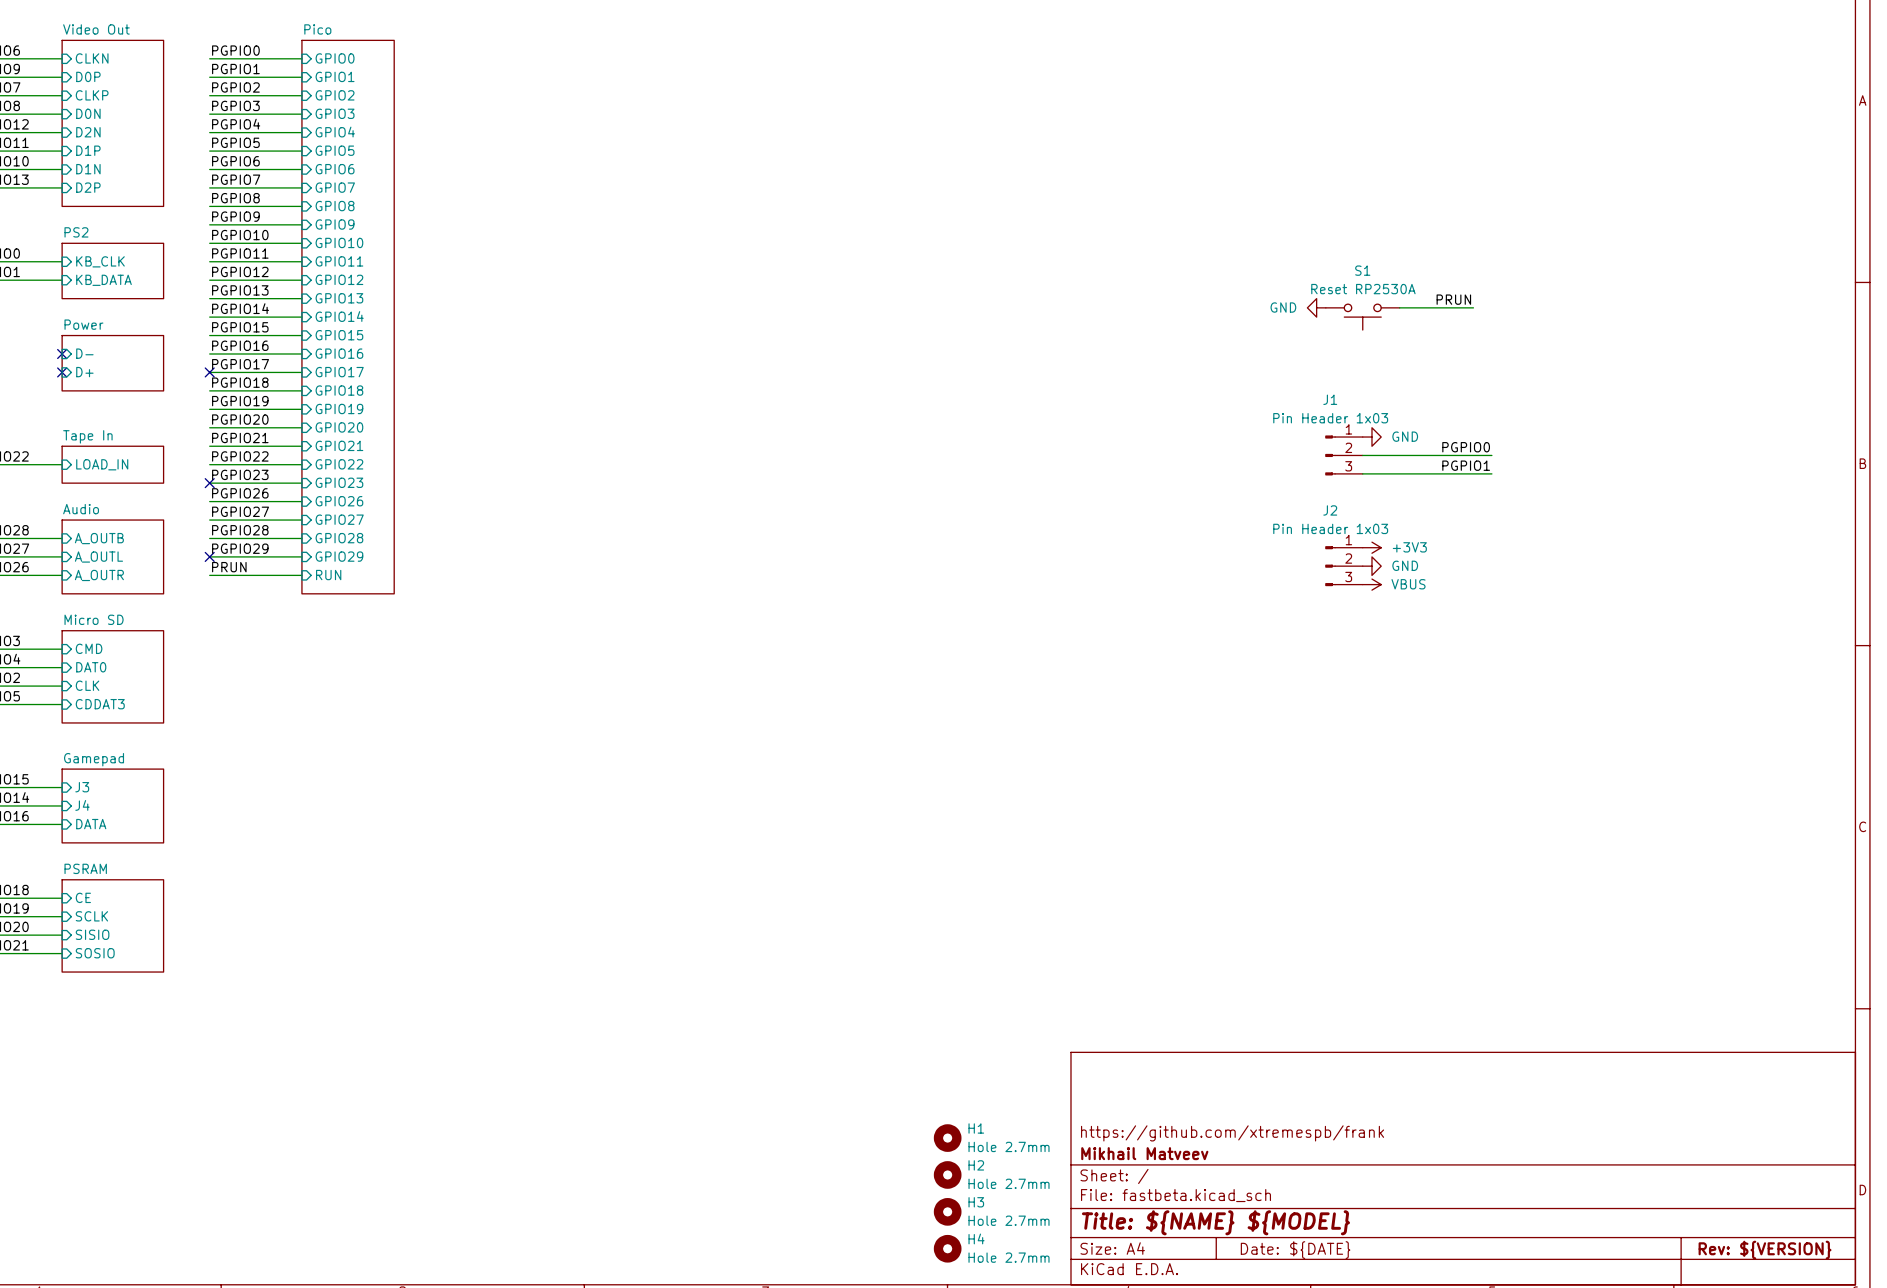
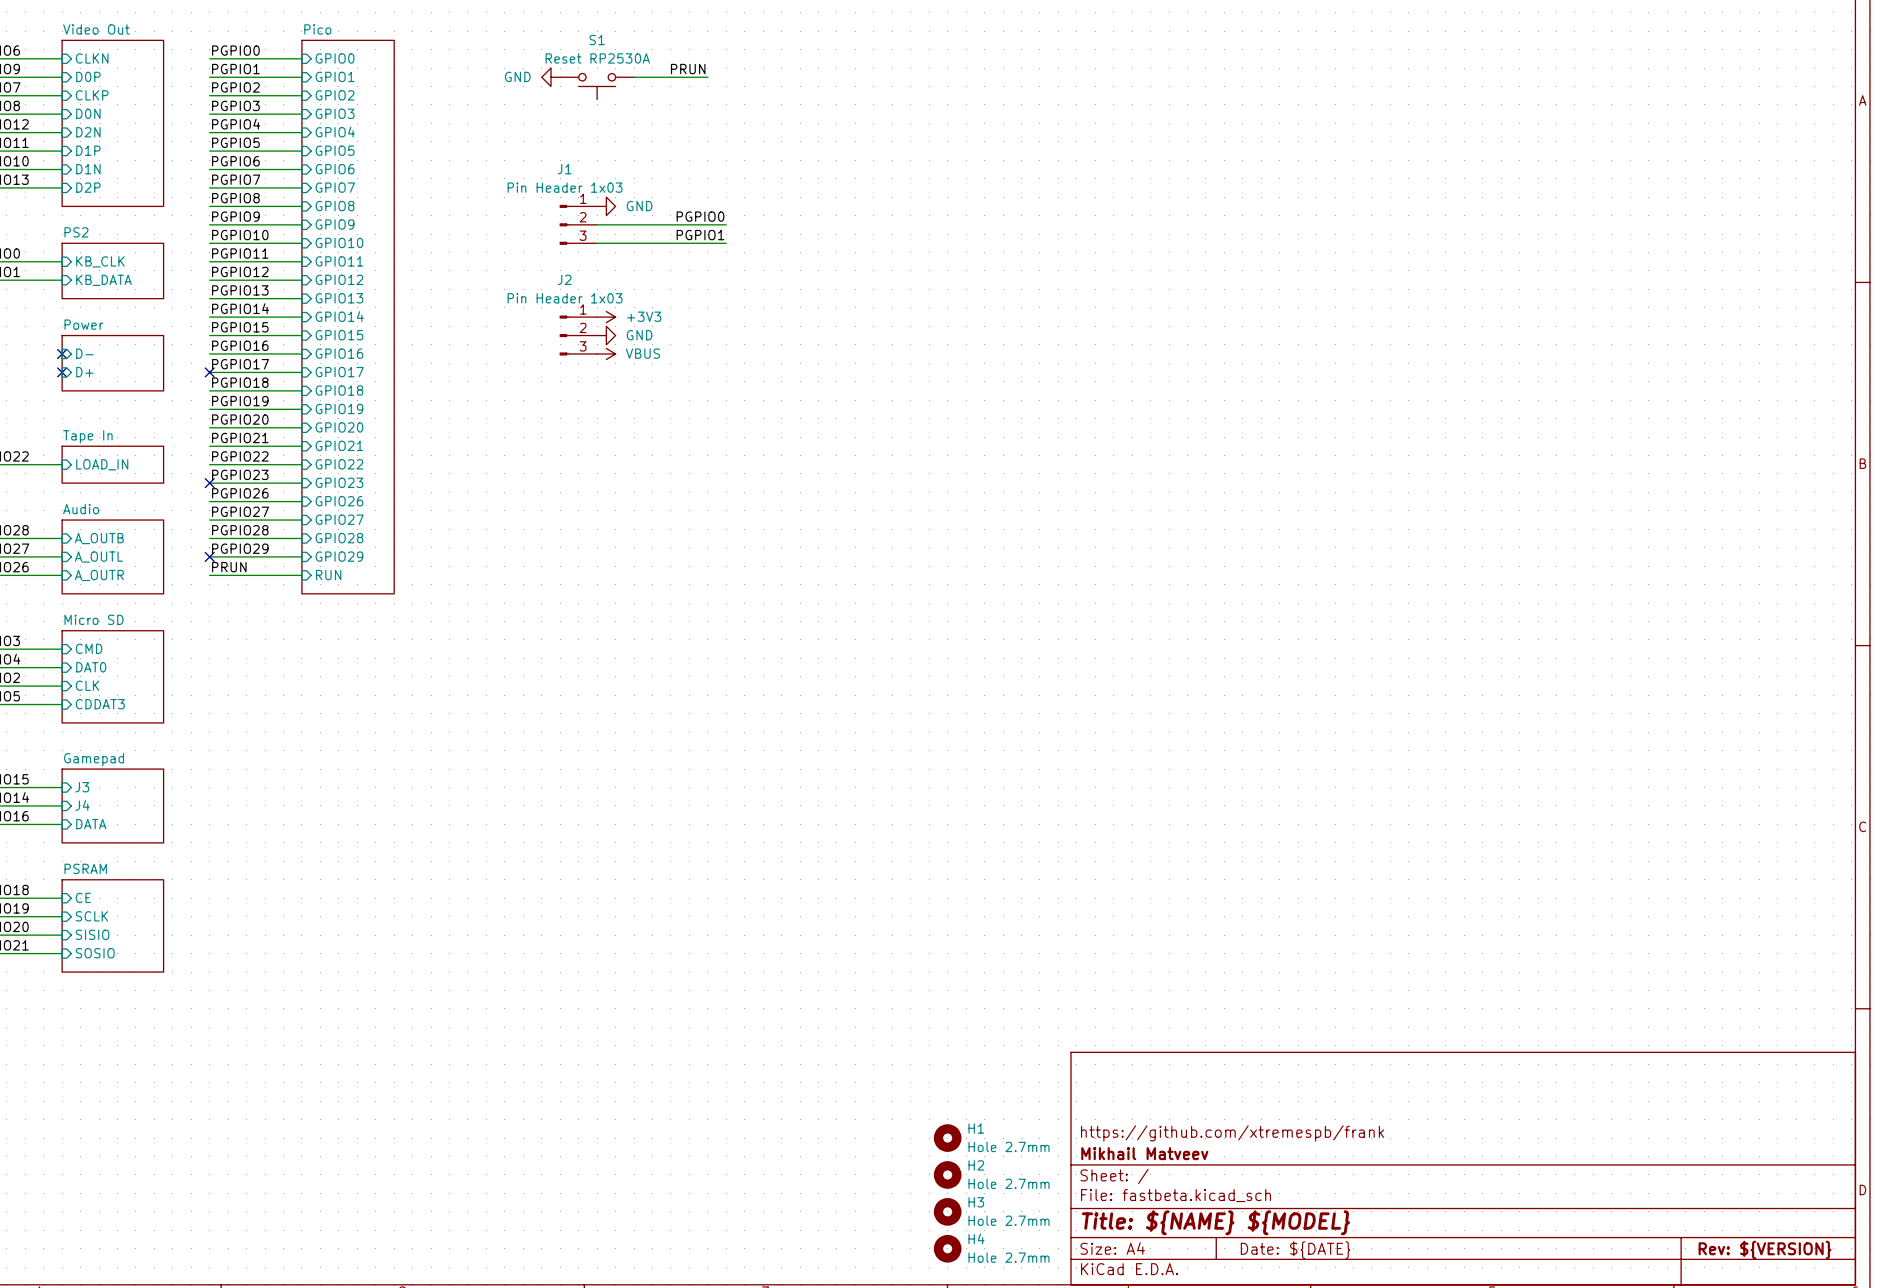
label: none -> PRUN (688, 69)
power symbol: none -> GND (551, 77)
wire: none -> (634, 77) (707, 77)
power symbol: none -> GND (606, 206)
label: none -> PGPIO0 (700, 216)
wire: none -> (597, 224) (726, 224)
label: none -> PGPIO1 (700, 235)
wire: none -> (597, 243) (726, 243)
label: PRUN (1453, 299) -> none
power symbol: GND (1316, 307) -> none
wire: (1399, 307) (1473, 307) -> none
power symbol: none -> +3V3 (606, 317)
S1 position: (1362, 317) -> (597, 86)
power symbol: none -> GND (606, 335)
power symbol: none -> VBUS (606, 353)
power symbol: GND (1371, 437) -> none
label: PGPIO0 (1466, 447) -> none
J1 position: (1344, 455) -> (578, 224)
wire: (1362, 455) (1491, 455) -> none
label: PGPIO1 (1466, 465) -> none
wire: (1362, 473) (1491, 473) -> none
power symbol: +3V3 (1371, 547) -> none
J2 position: (1344, 566) -> (578, 335)
power symbol: GND (1371, 566) -> none
power symbol: VBUS (1371, 584) -> none

